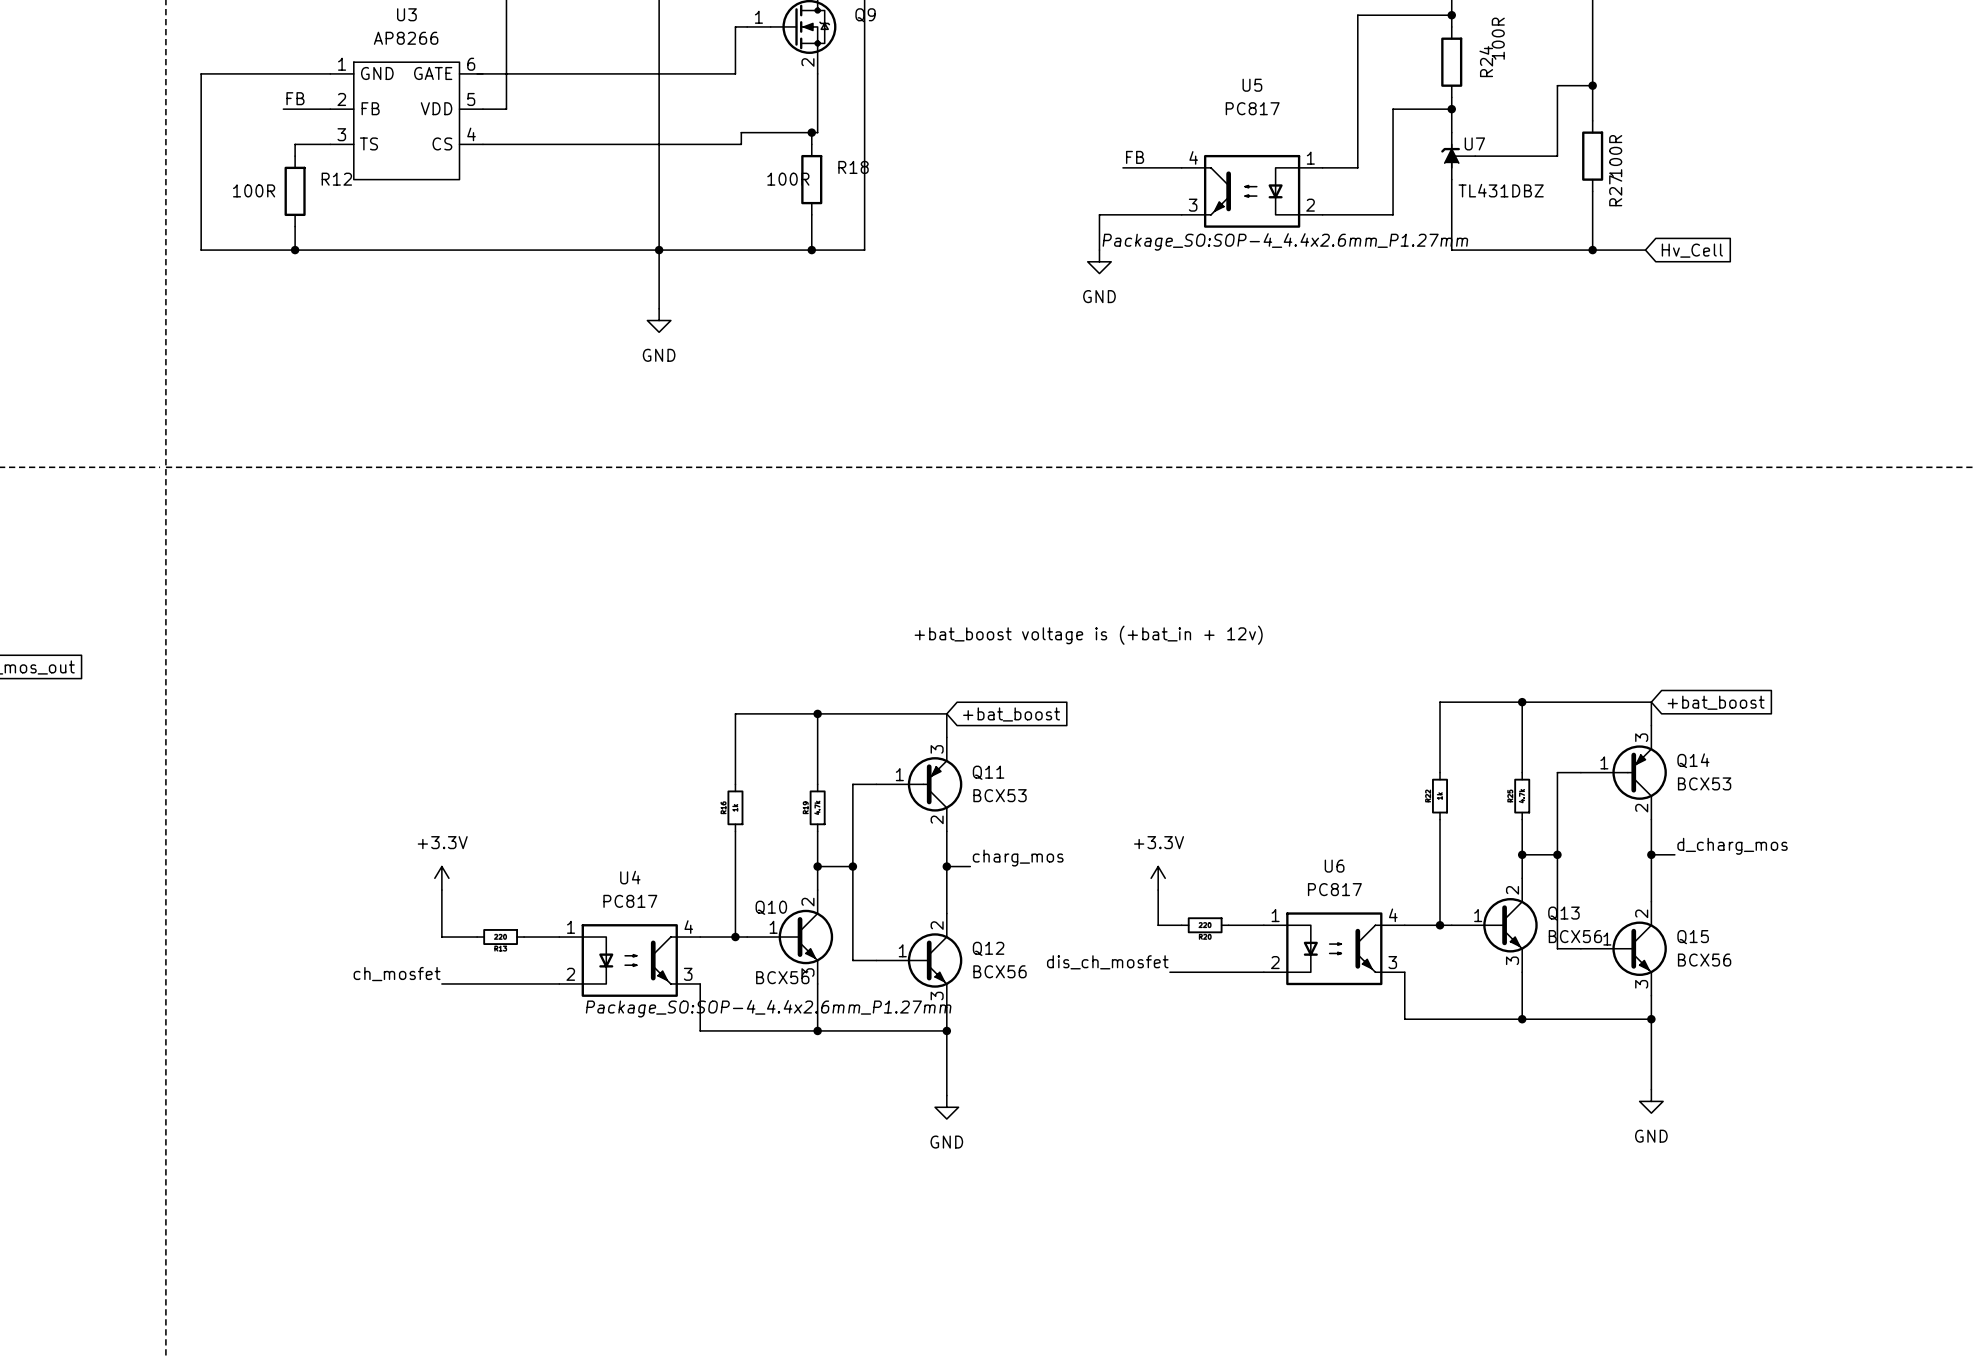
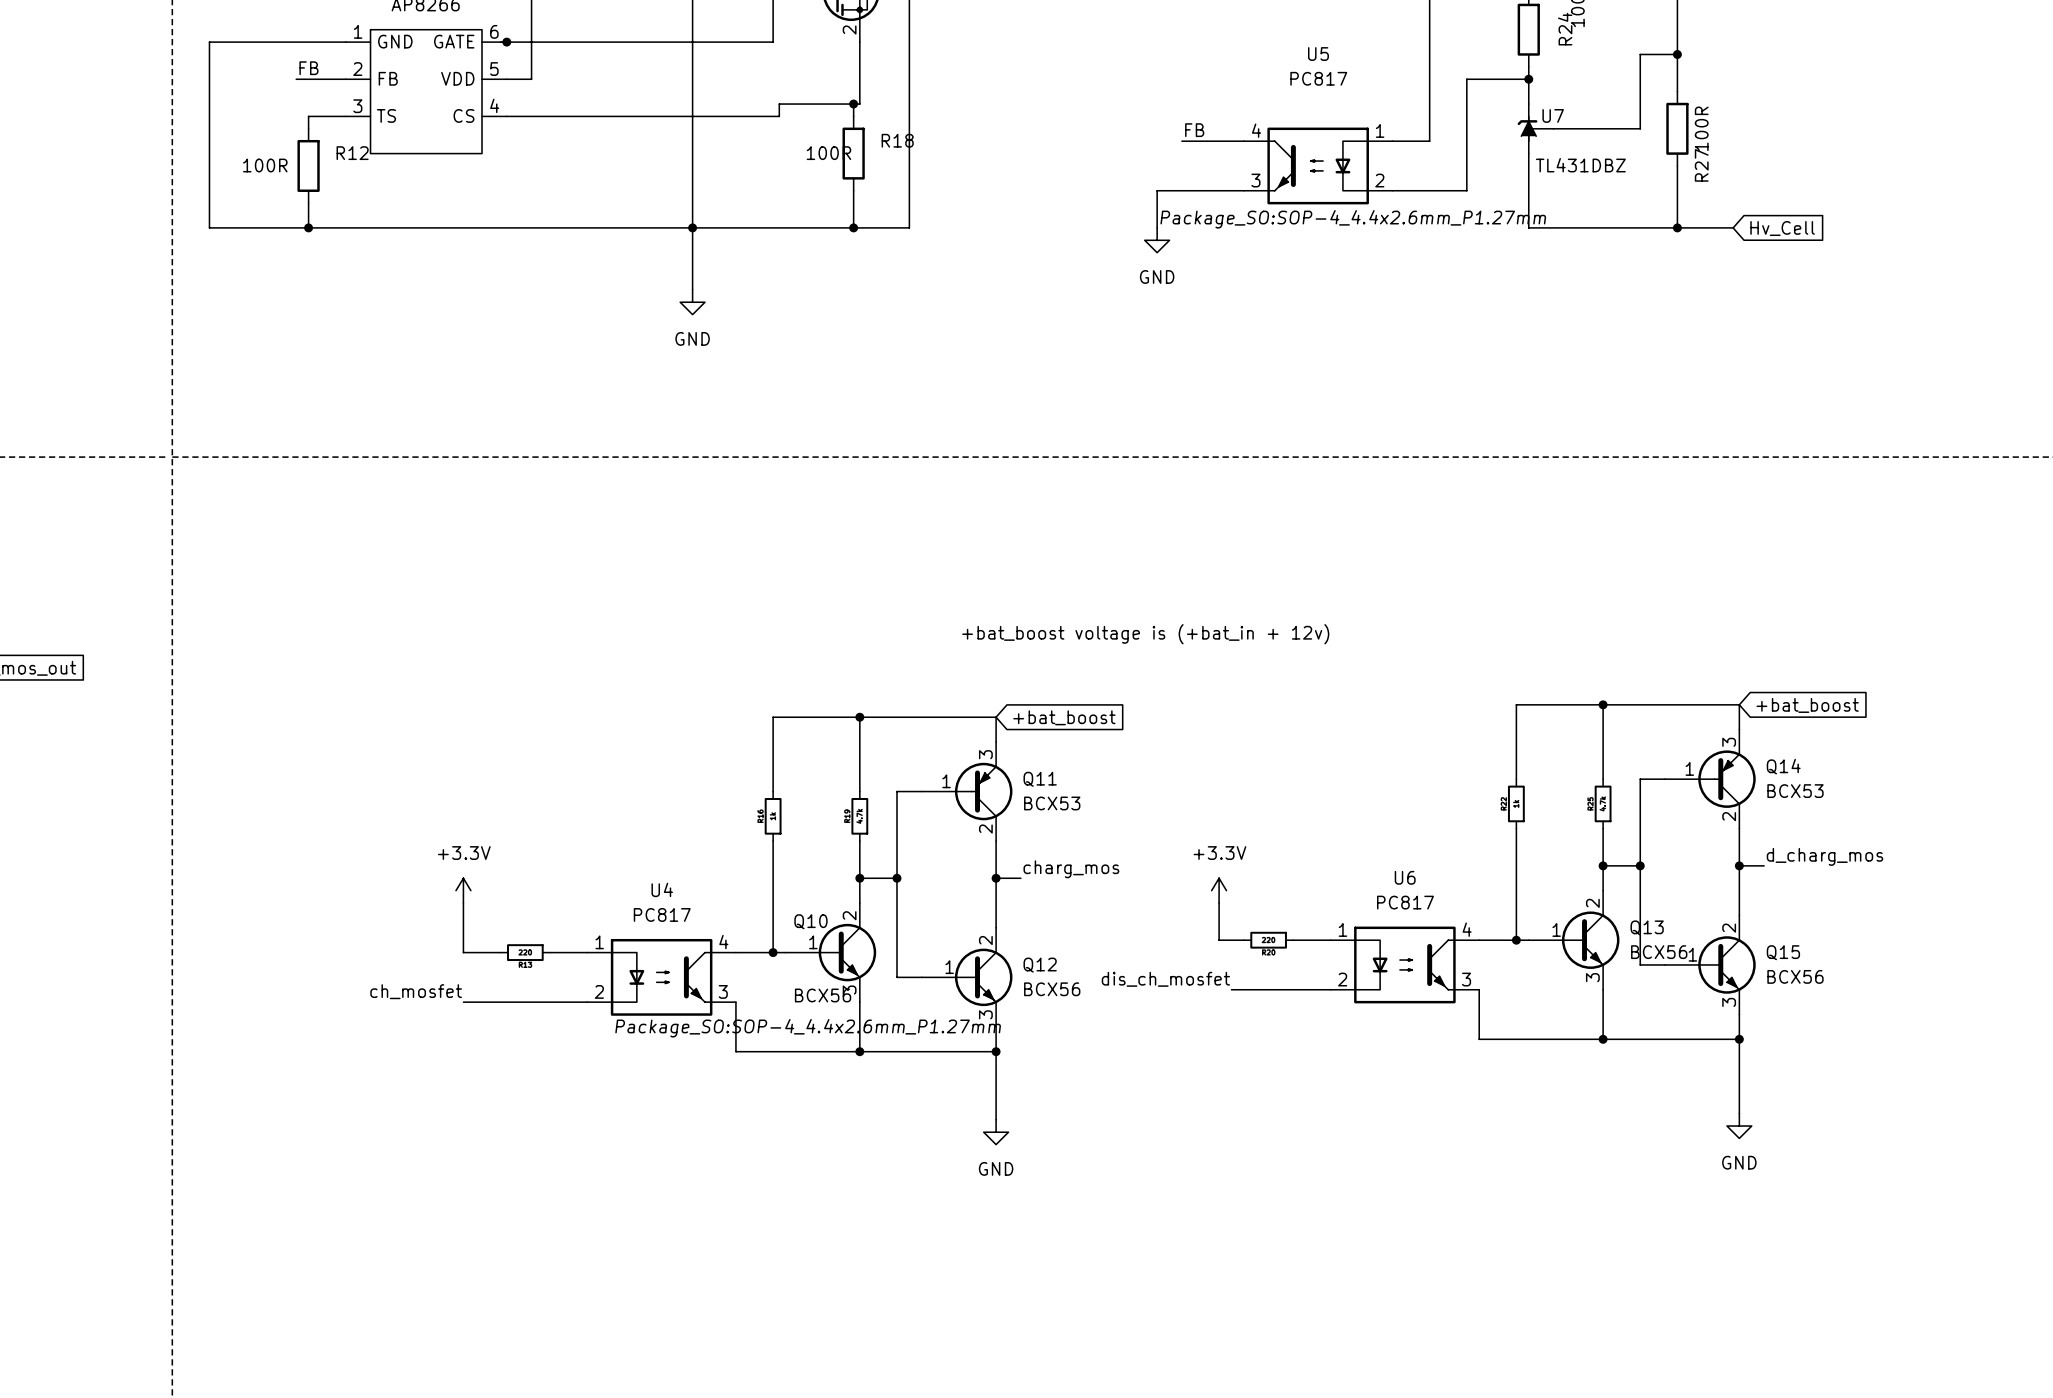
junction: none -> (506, 42)

